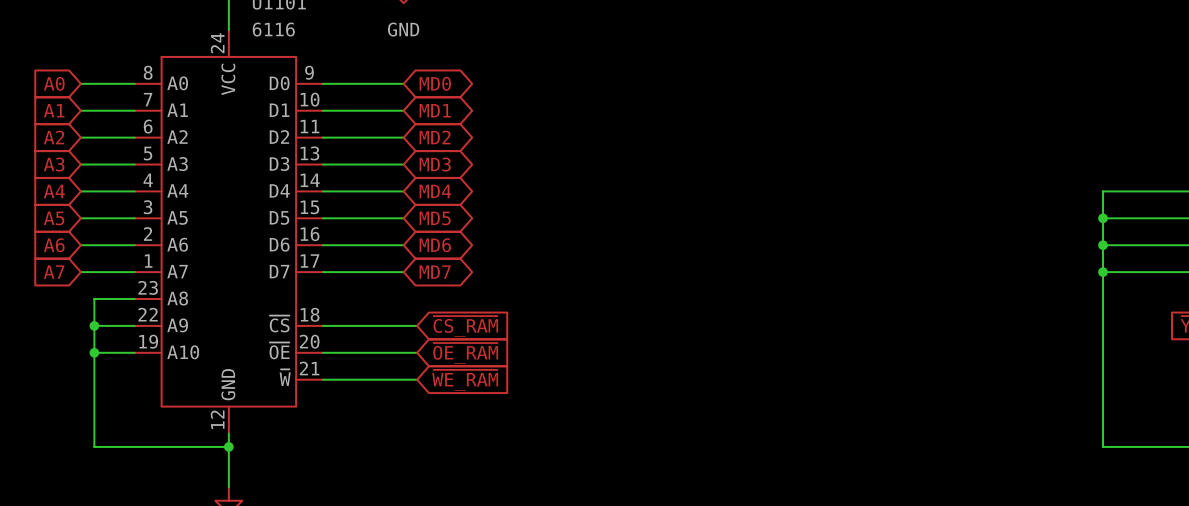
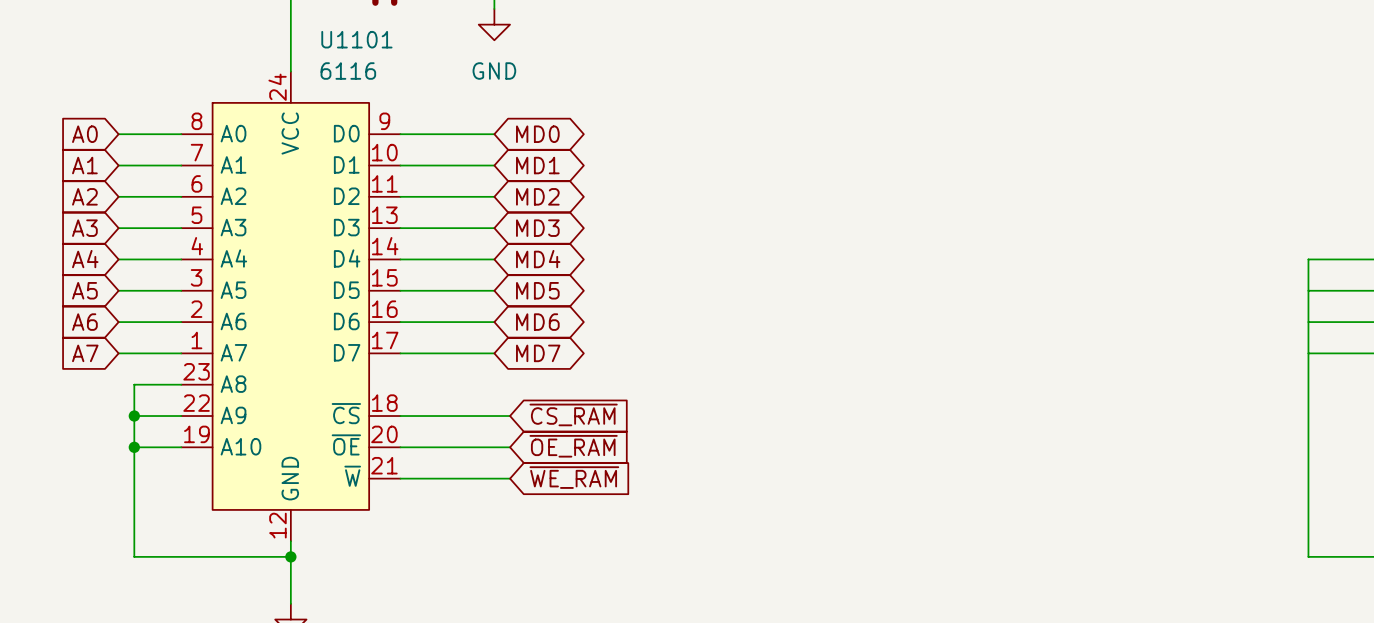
junction: (1103, 218) -> none
junction: (1103, 245) -> none
junction: (1103, 272) -> none

